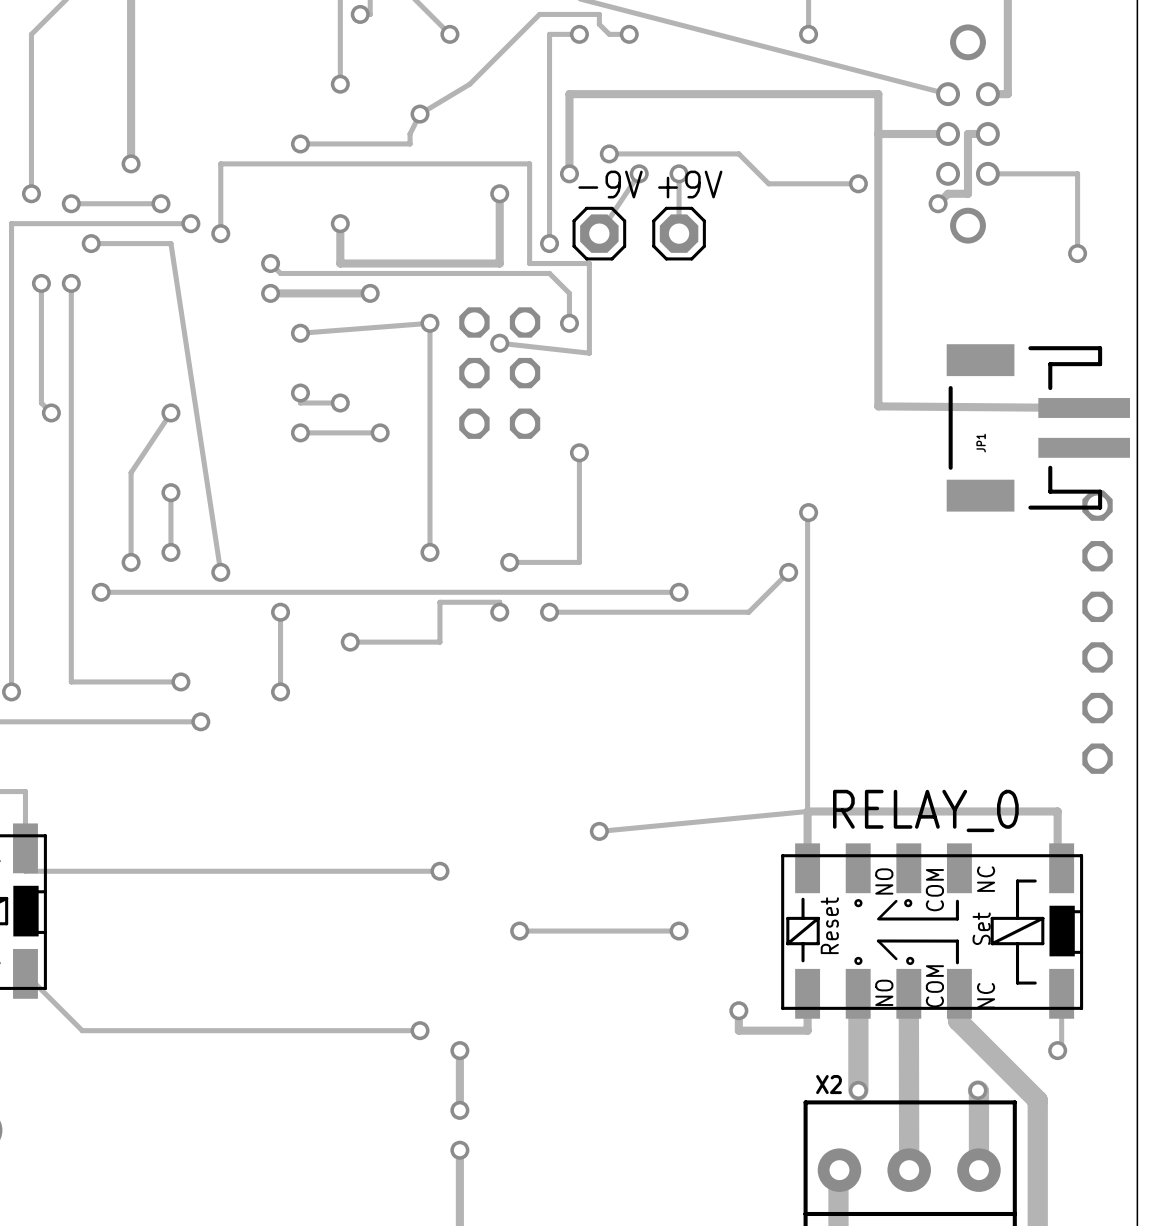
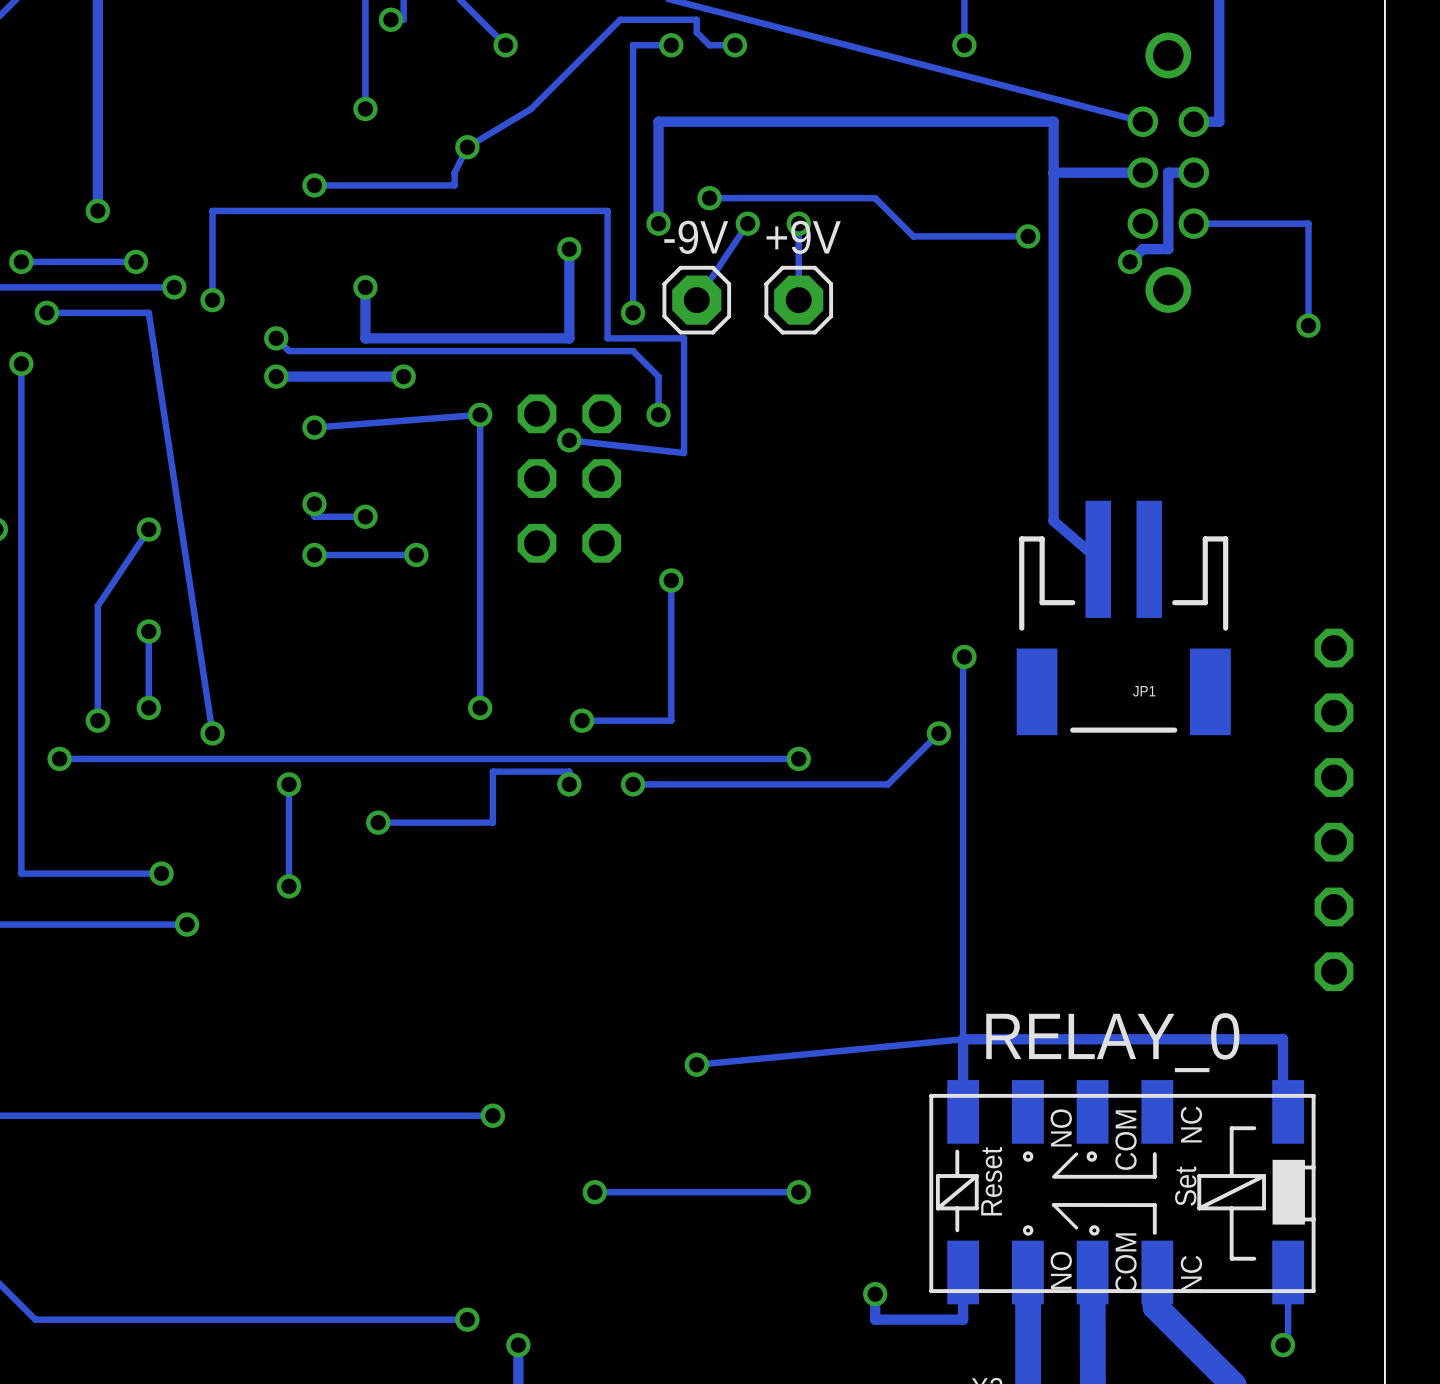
track: (878, 406) (1084, 407) -> (1053, 521) (1098, 559)
JP1 rotation: 0° (1038, 427) -> 90° counterclockwise (1123, 617)
JP1 position: (1038, 427) -> (1123, 617)

